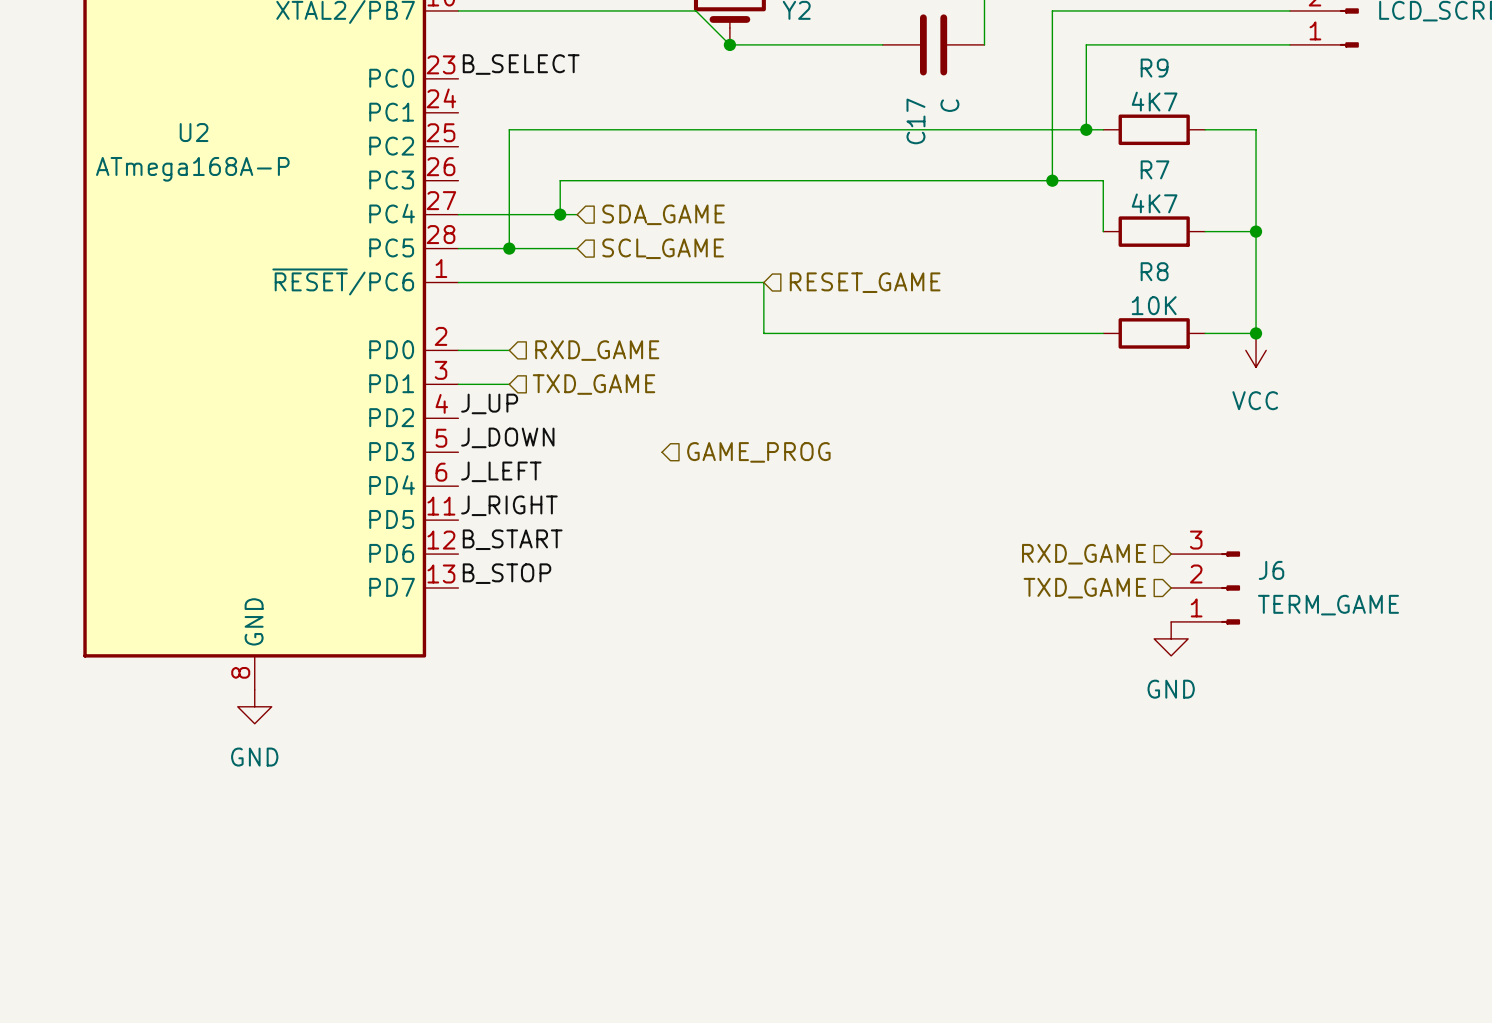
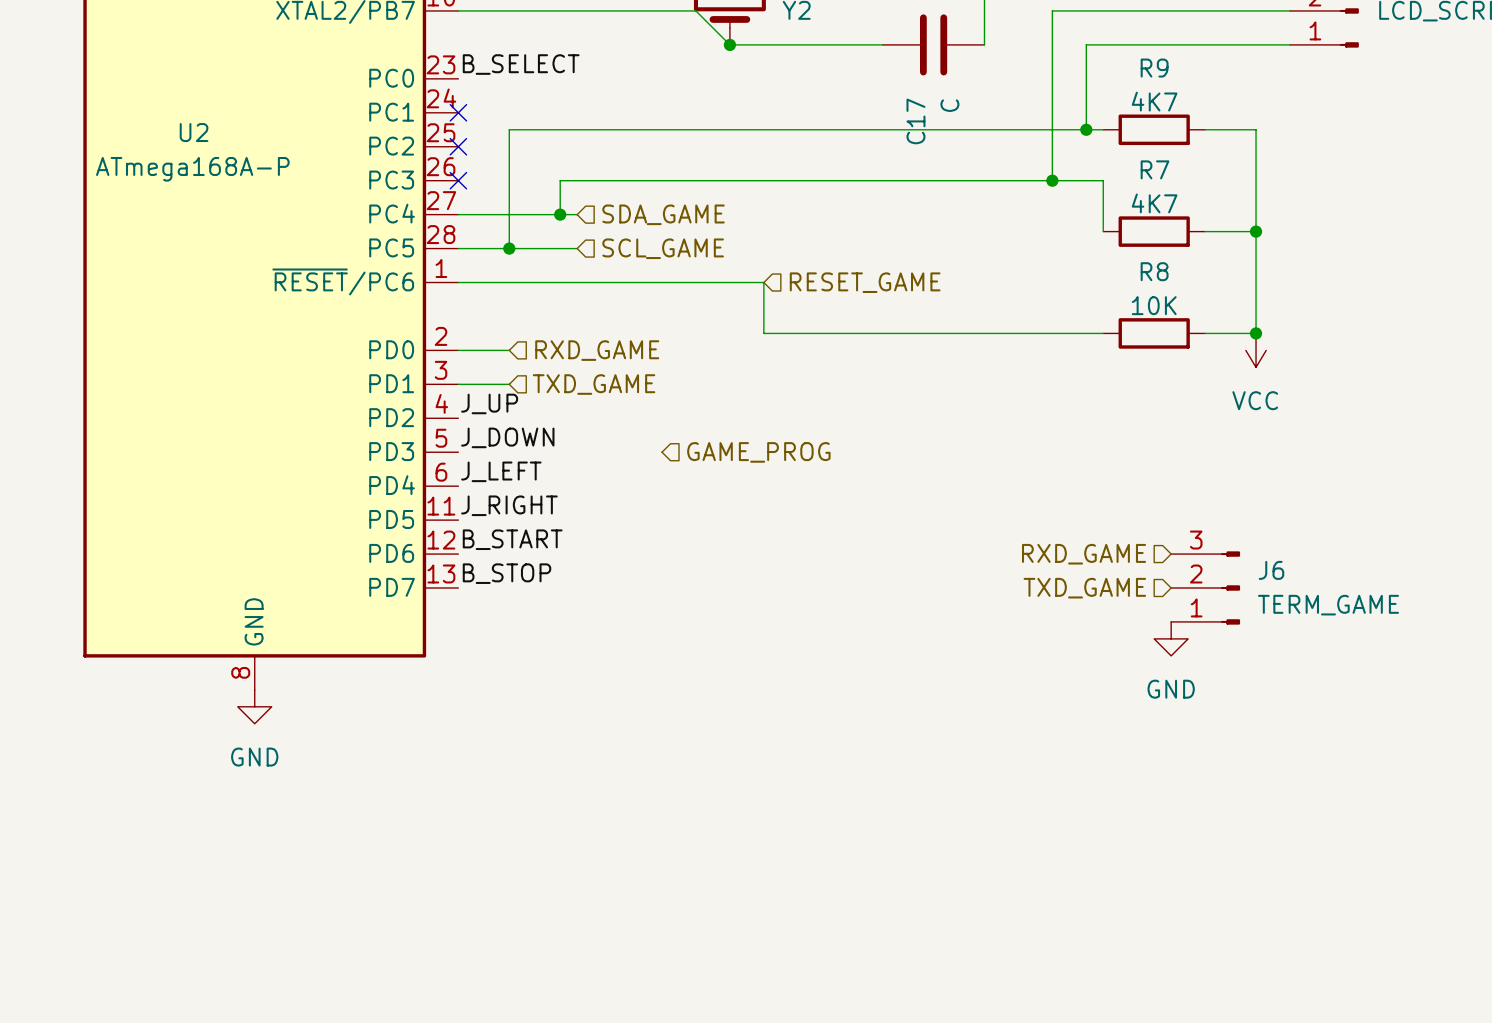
no-connect mark: none -> (458, 112)
no-connect mark: none -> (458, 146)
no-connect mark: none -> (458, 180)

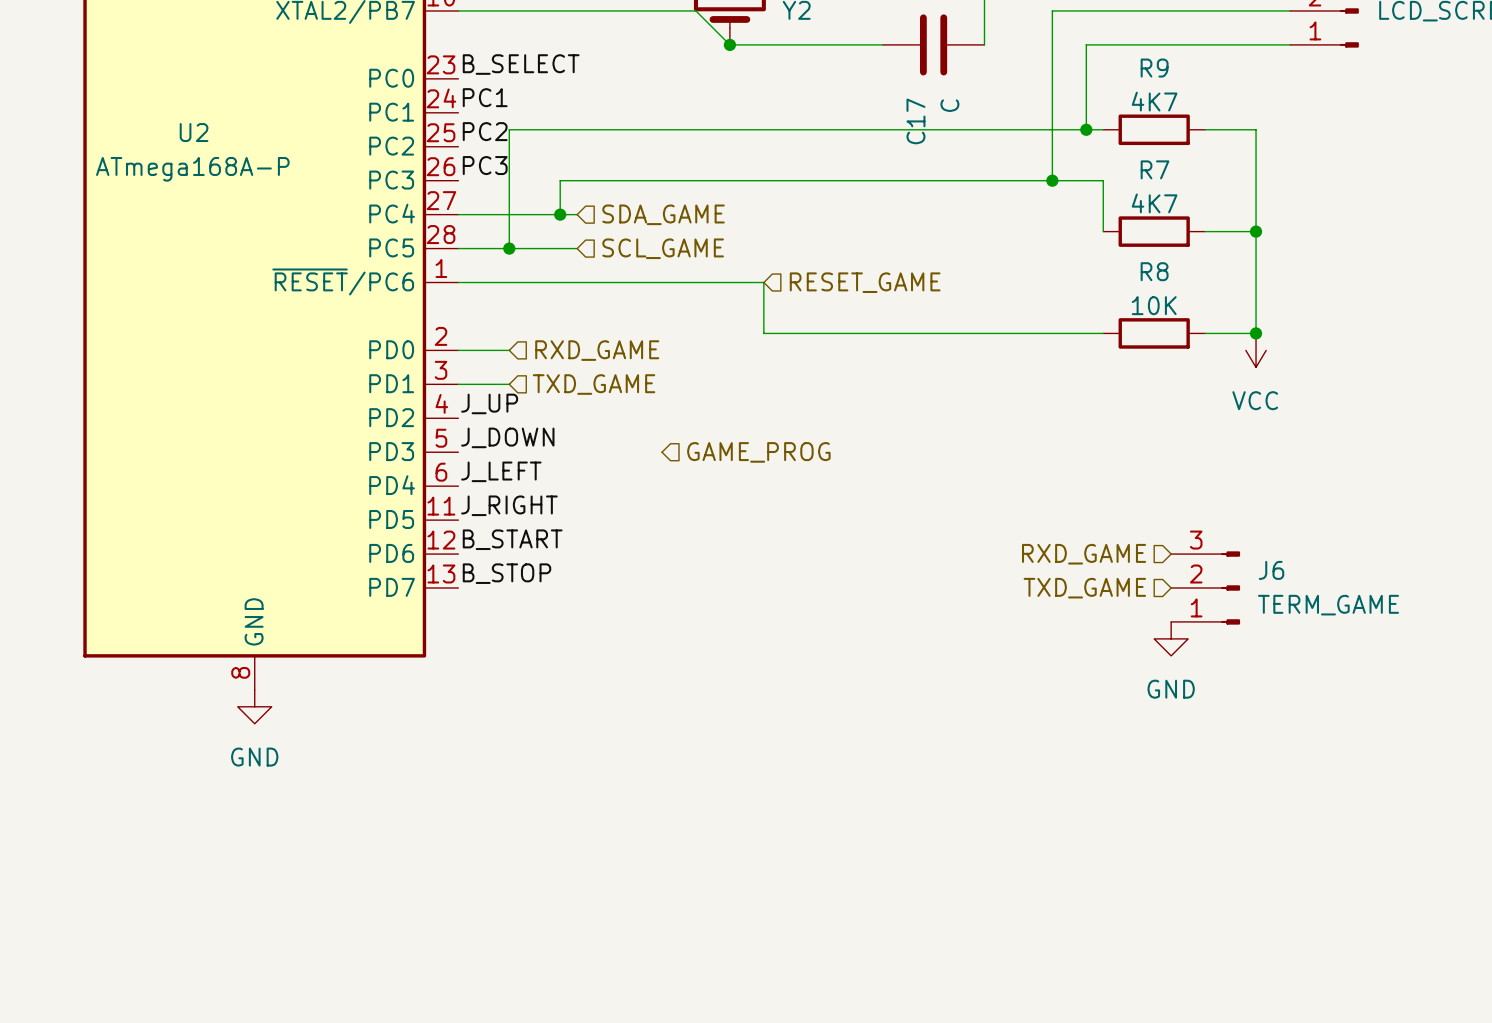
label: none -> PC1 (485, 97)
no-connect mark: (458, 112) -> none
label: none -> PC2 (485, 131)
no-connect mark: (458, 146) -> none
label: none -> PC3 (485, 165)
no-connect mark: (458, 180) -> none

